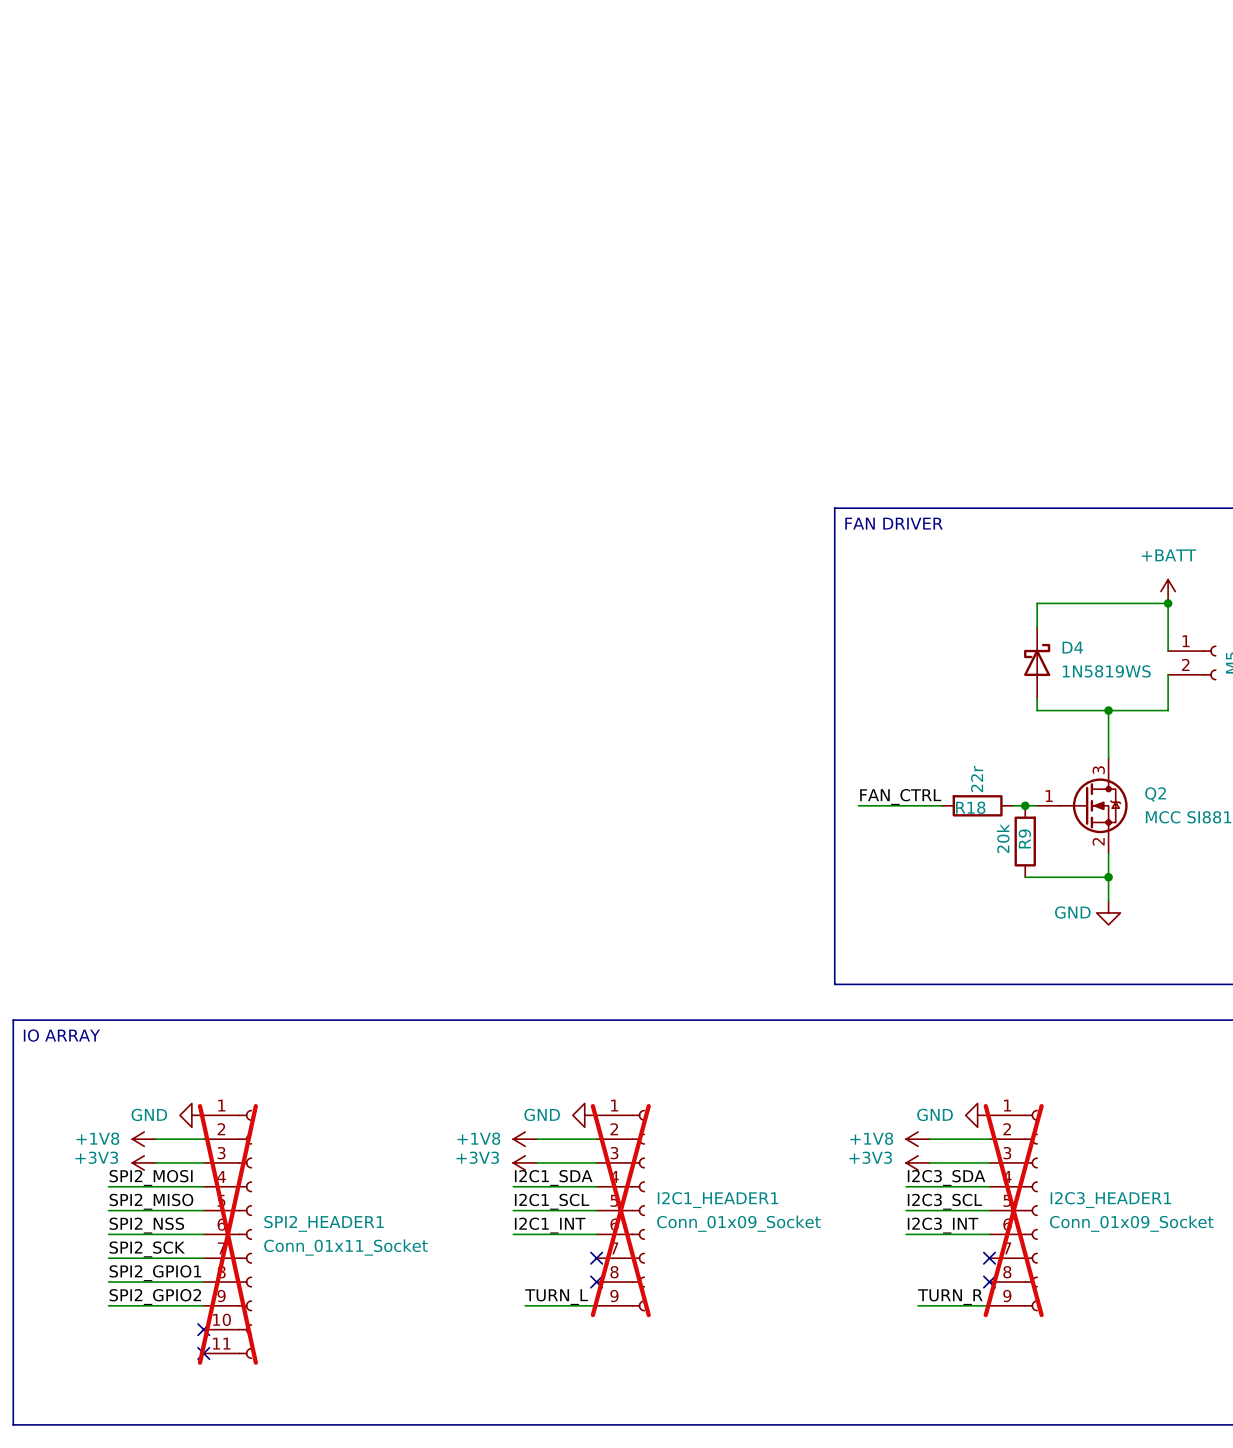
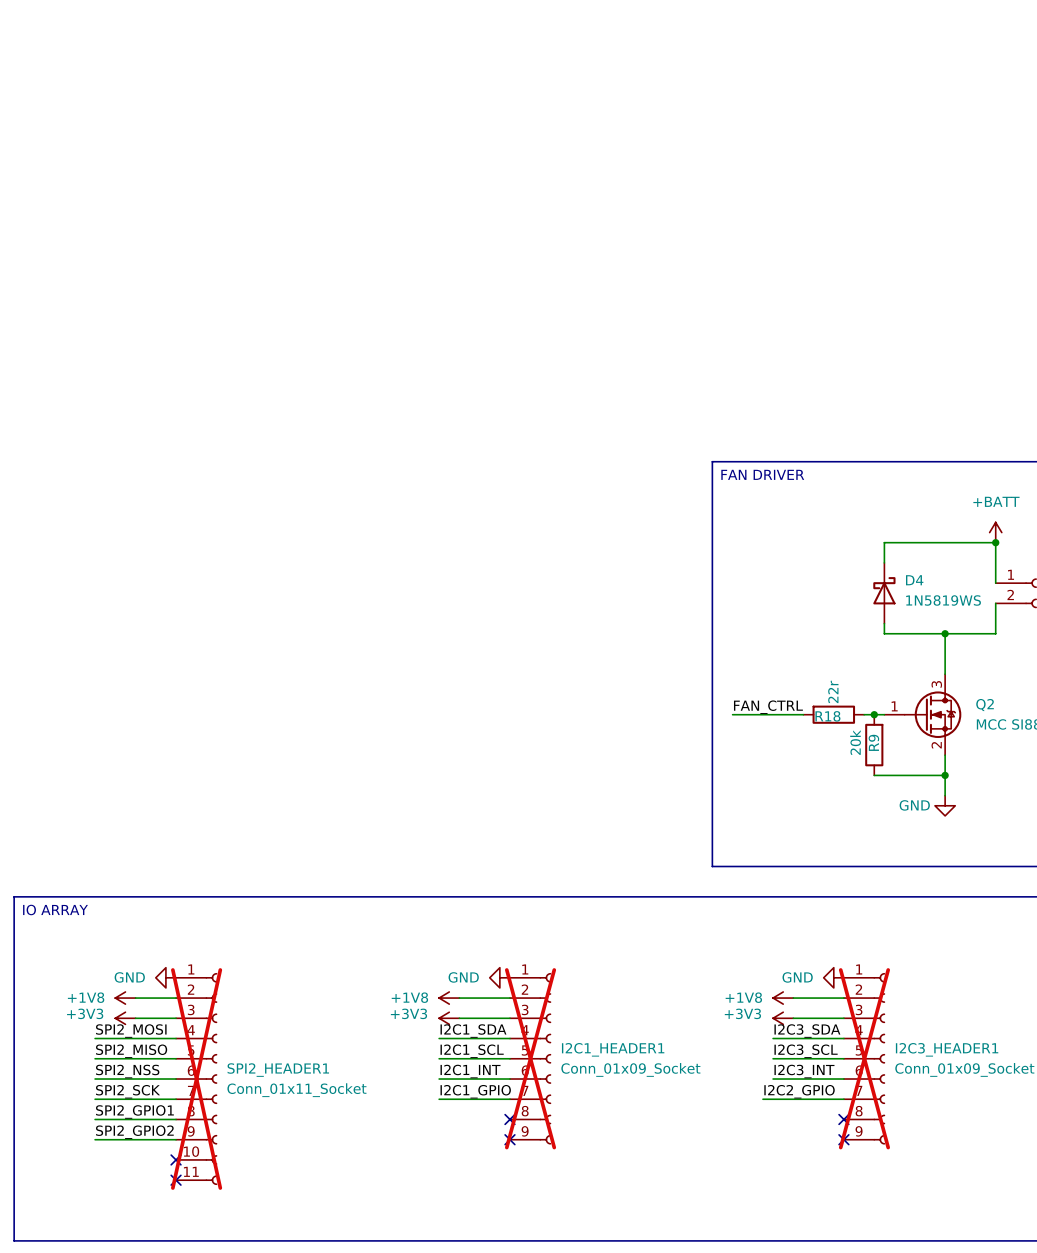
label: none -> I2C1_GPIO (475, 1091)
label: none -> I2C2_GPIO (799, 1091)
wire: none -> (439, 1099) (509, 1099)
no-connect mark position: (596, 1258) -> (509, 1139)
wire: none -> (762, 1099) (843, 1099)
no-connect mark position: (989, 1258) -> (843, 1139)
label: TURN_L (556, 1297) -> none
label: TURN_R (950, 1297) -> none
wire: (525, 1305) (596, 1305) -> none
wire: (918, 1305) (989, 1305) -> none

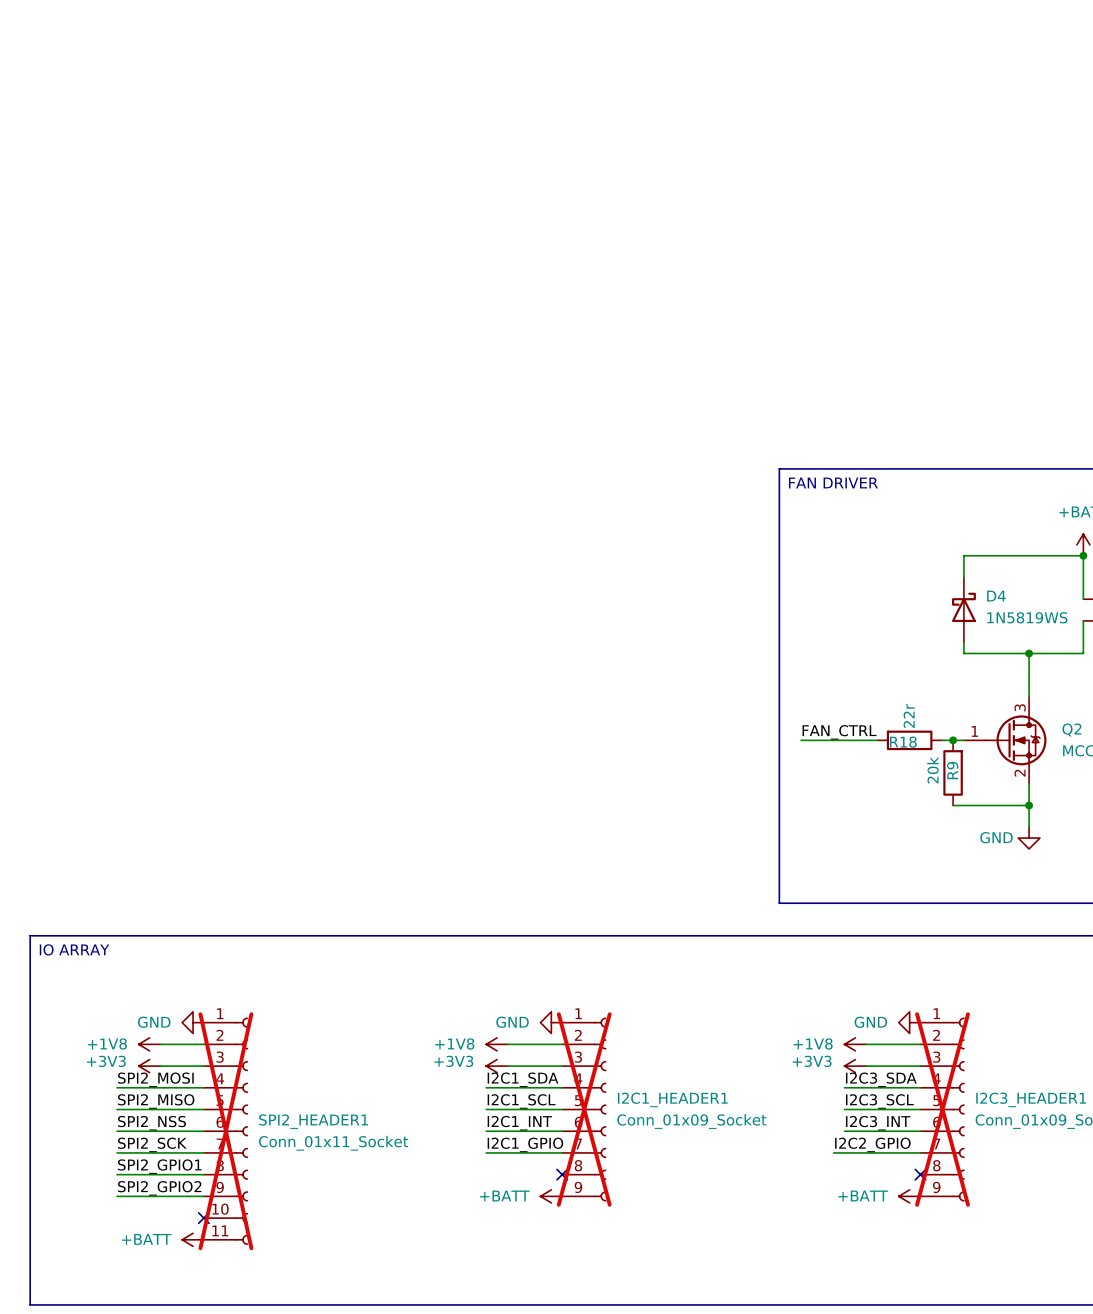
power symbol: none -> +BATT (551, 1196)
no-connect mark: (509, 1139) -> none
power symbol: none -> +BATT (909, 1196)
no-connect mark: (843, 1139) -> none
power symbol: none -> +BATT (193, 1239)
no-connect mark: (176, 1180) -> none

